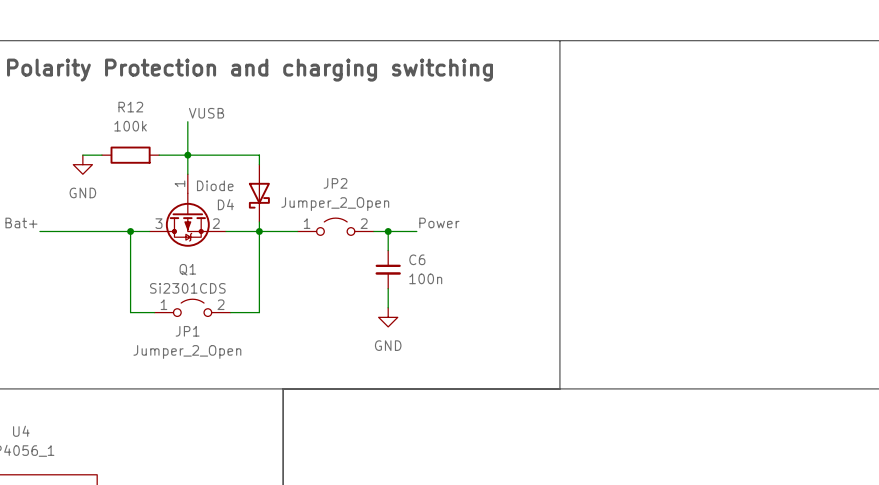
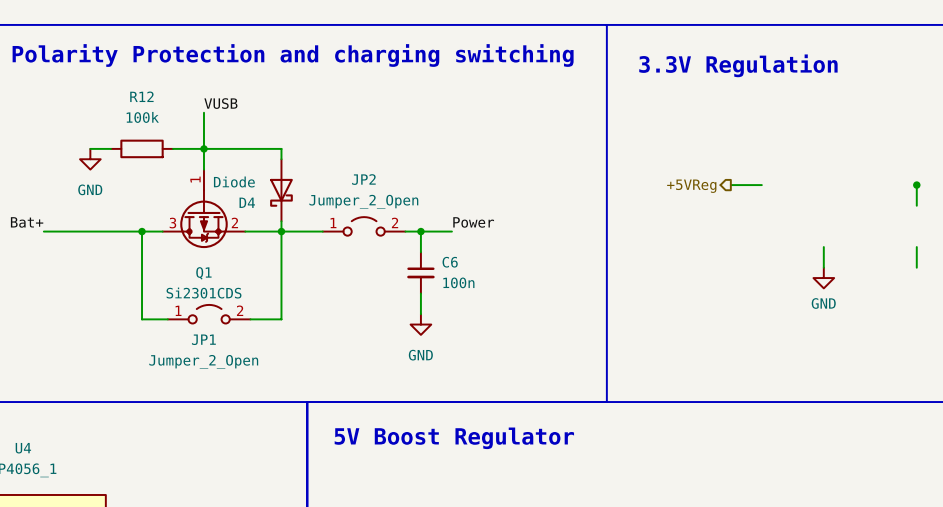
text: none -> 3.3V Regulation (738, 65)
wire: none -> (730, 185) (761, 185)
wire: none -> (916, 185) (916, 205)
junction: none -> (916, 185)
hierarchical label: none -> +5VReg (691, 186)
wire: none -> (823, 247) (823, 267)
wire: none -> (916, 247) (916, 267)
power symbol: none -> GND (823, 278)
text: none -> 5V Boost Regulator (454, 438)

